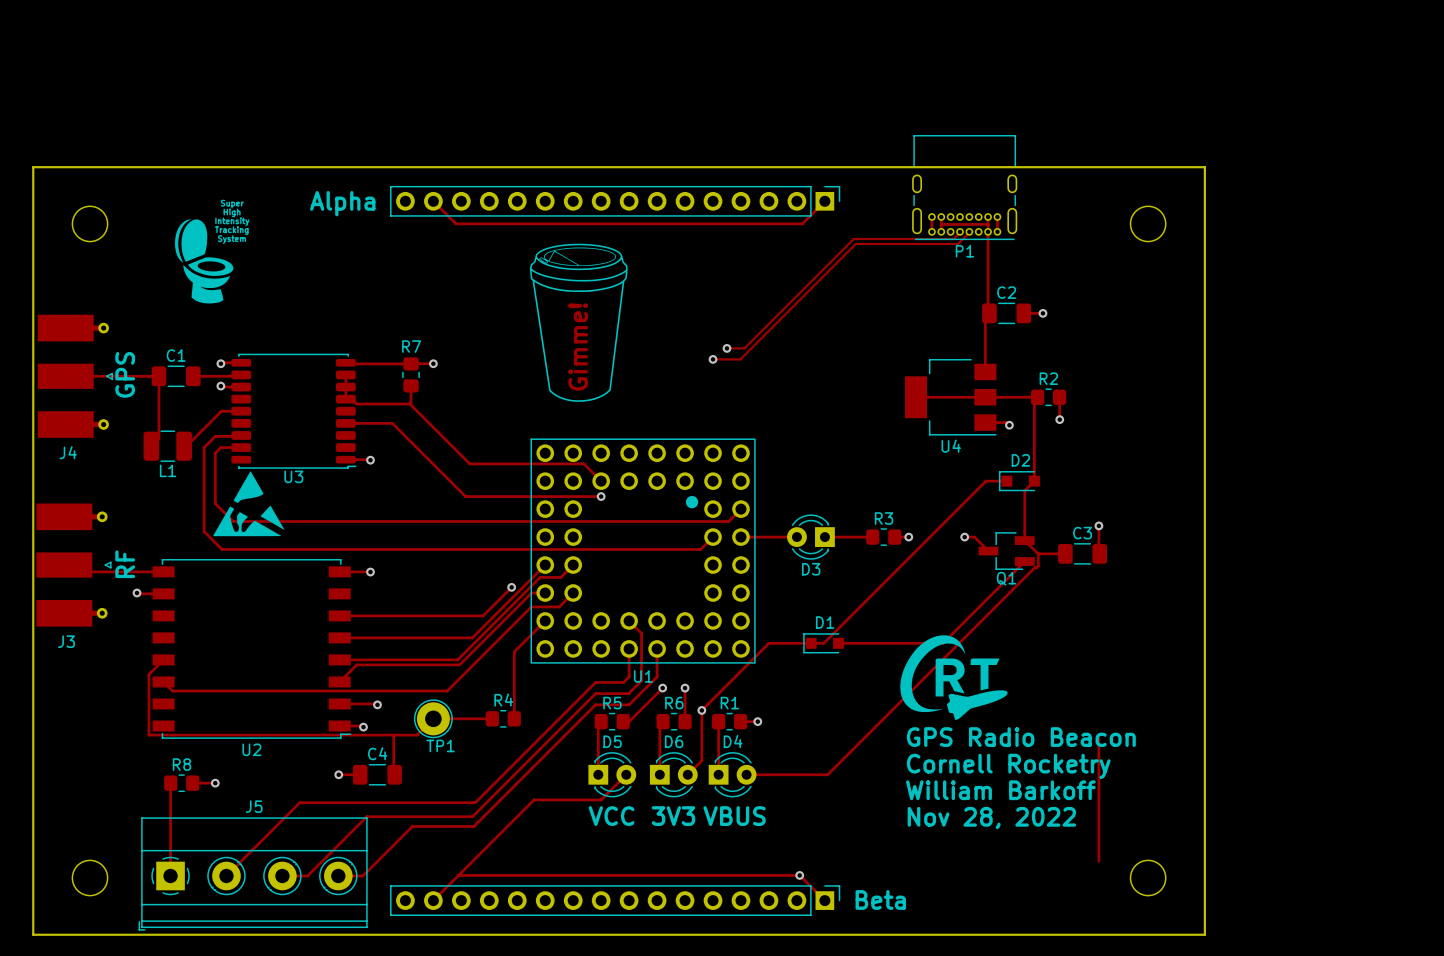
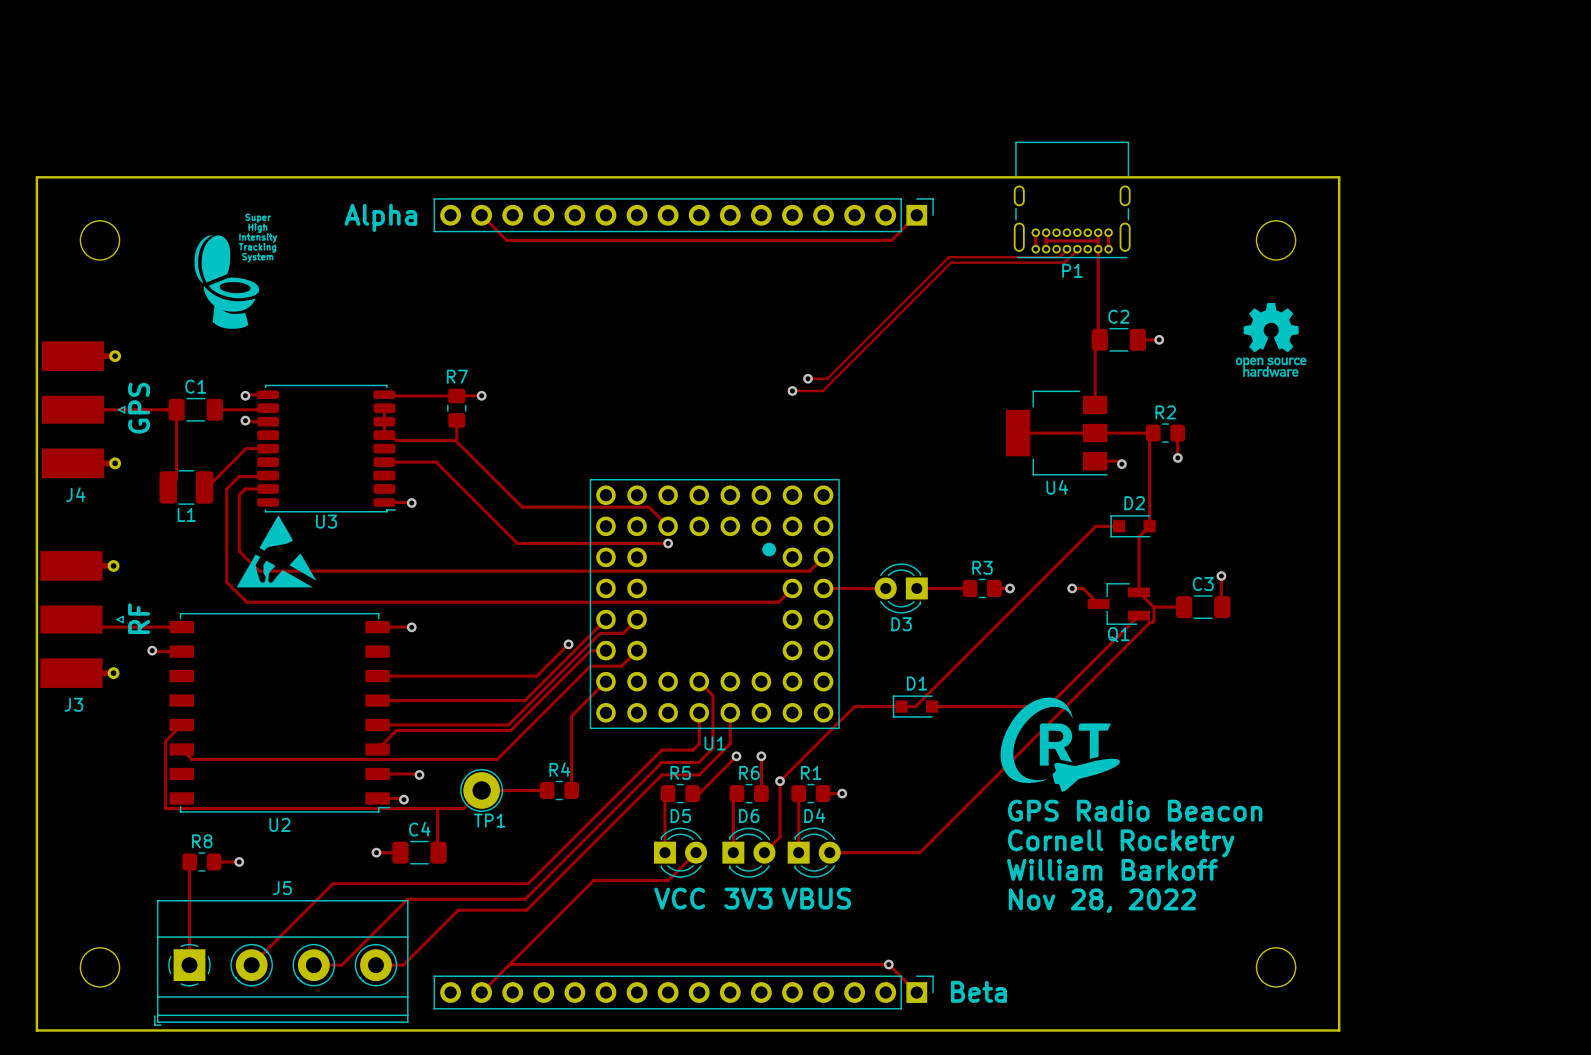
drawing: [529, 243, 628, 402] -> none
drawing: none -> [1235, 302, 1307, 377]
text: Gimme! (578, 346) -> none
track: (1098, 738) (1098, 861) -> none

